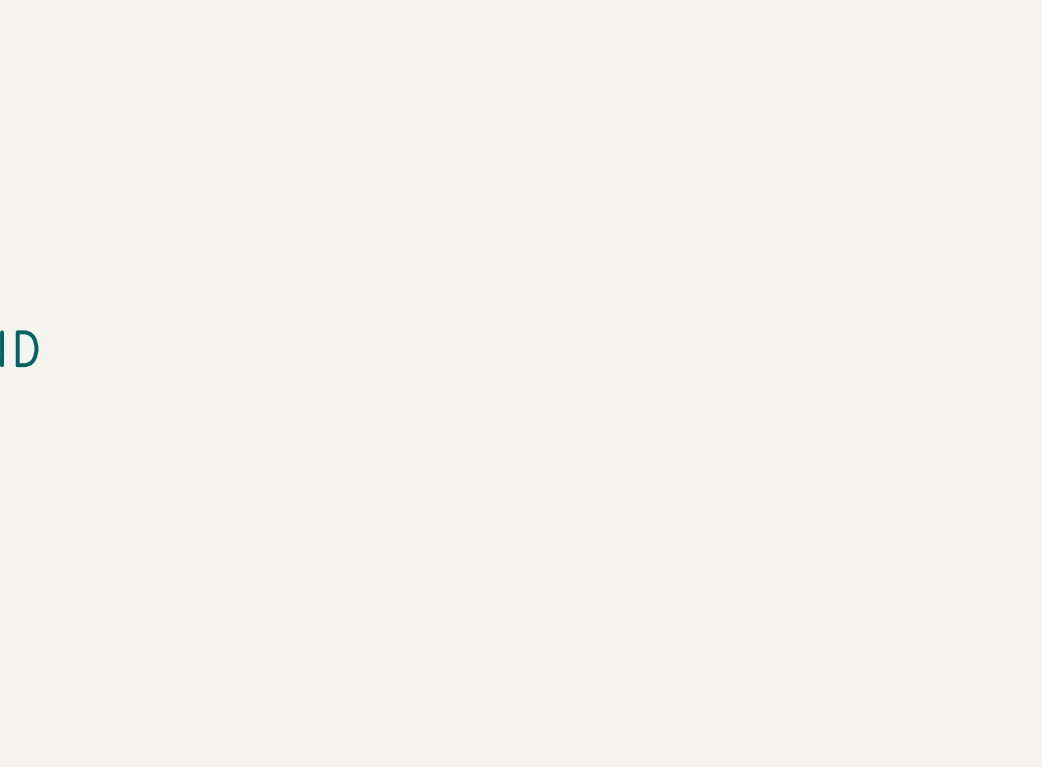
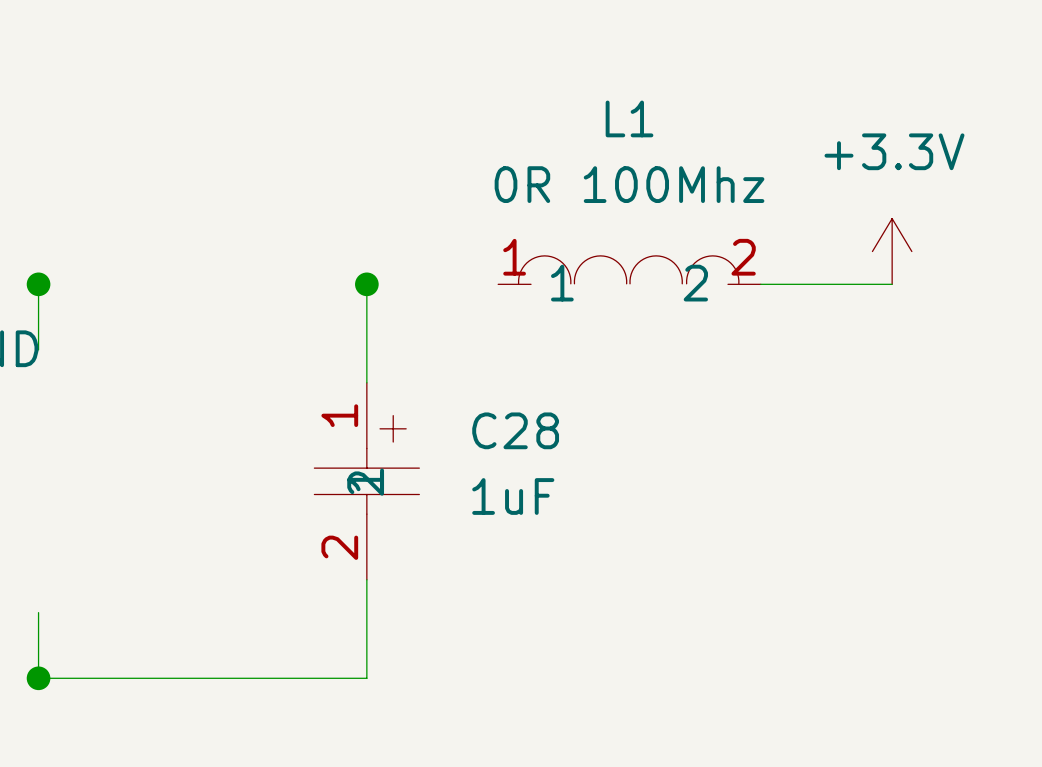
power symbol: none -> +3.3V (892, 251)
L1: none -> 0R 100Mhz (629, 270)
wire: none -> (38, 284) (38, 349)
junction: none -> (38, 284)
wire: none -> (366, 284) (366, 382)
junction: none -> (366, 284)
wire: none -> (760, 284) (892, 284)
C28: none -> 1uF (366, 481)
wire: none -> (366, 579) (366, 678) (38, 678) (38, 612)
junction: none -> (38, 678)

